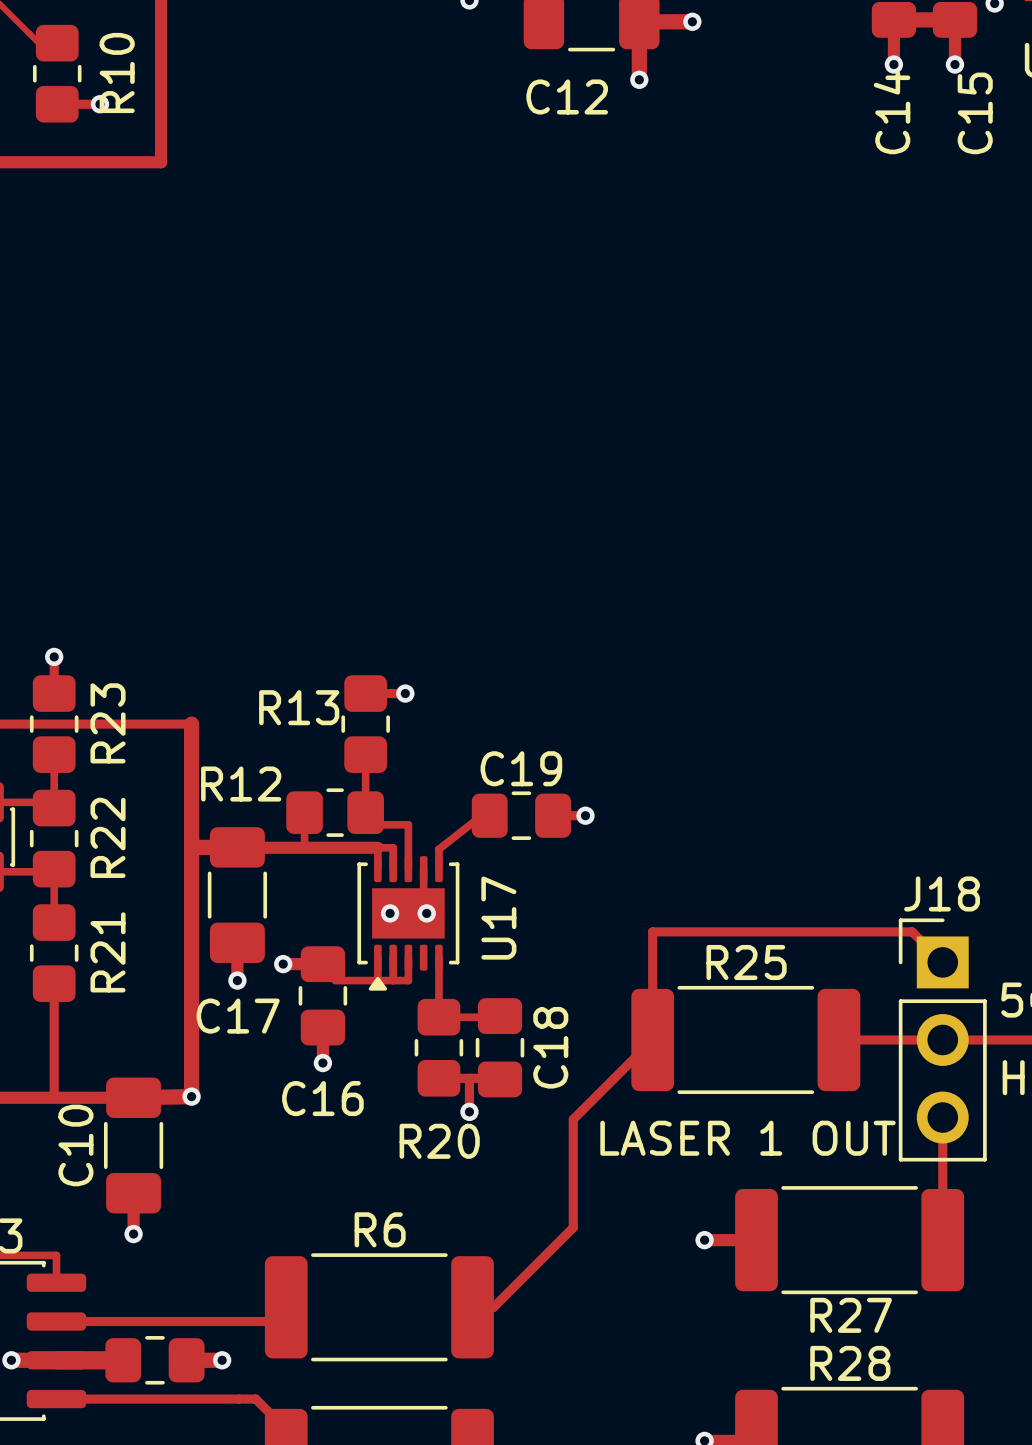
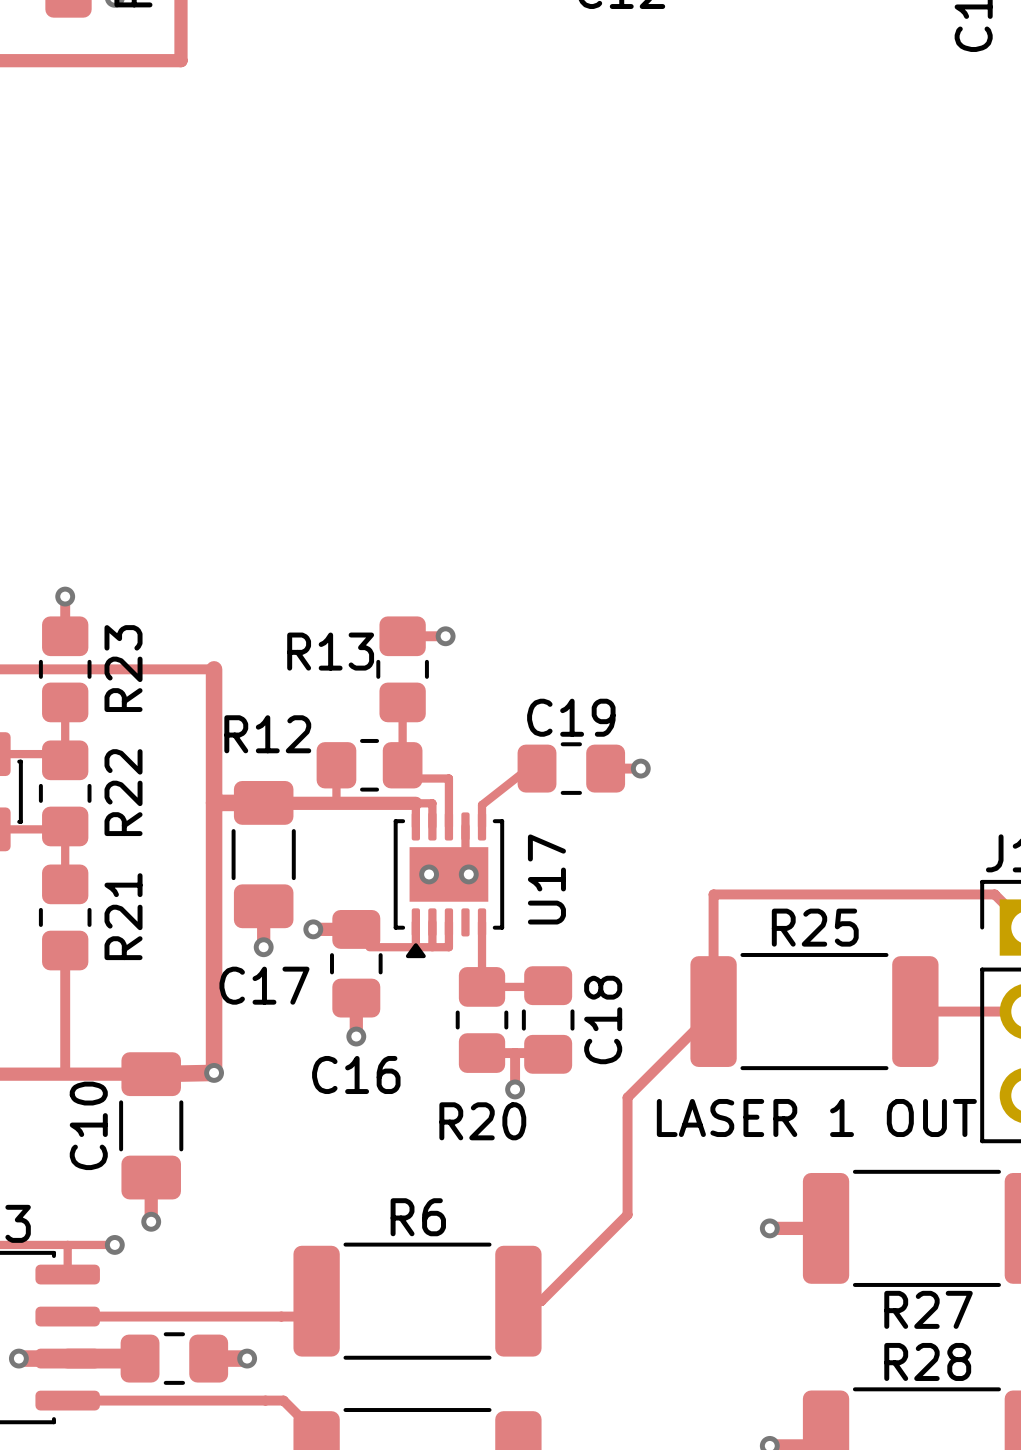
track: none -> (67, 1244) (114, 1244)
via: none -> (114, 1244)

